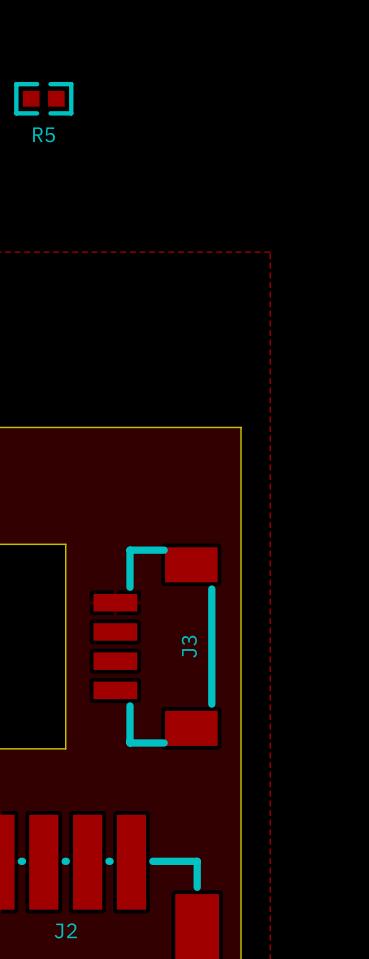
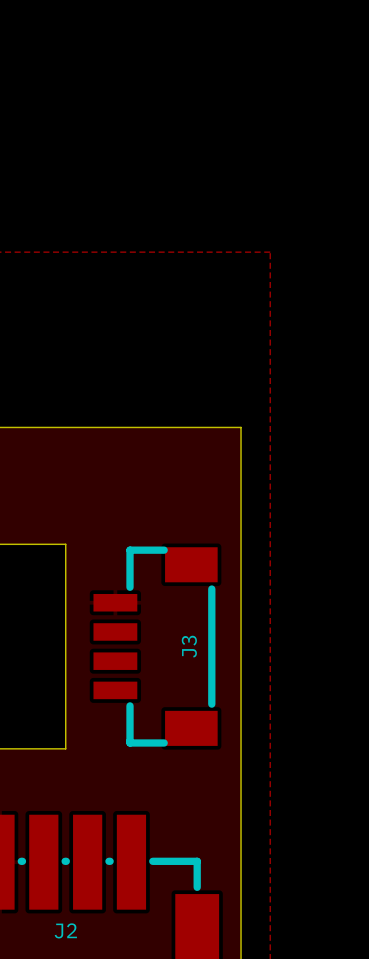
R5: (43, 98) -> none

